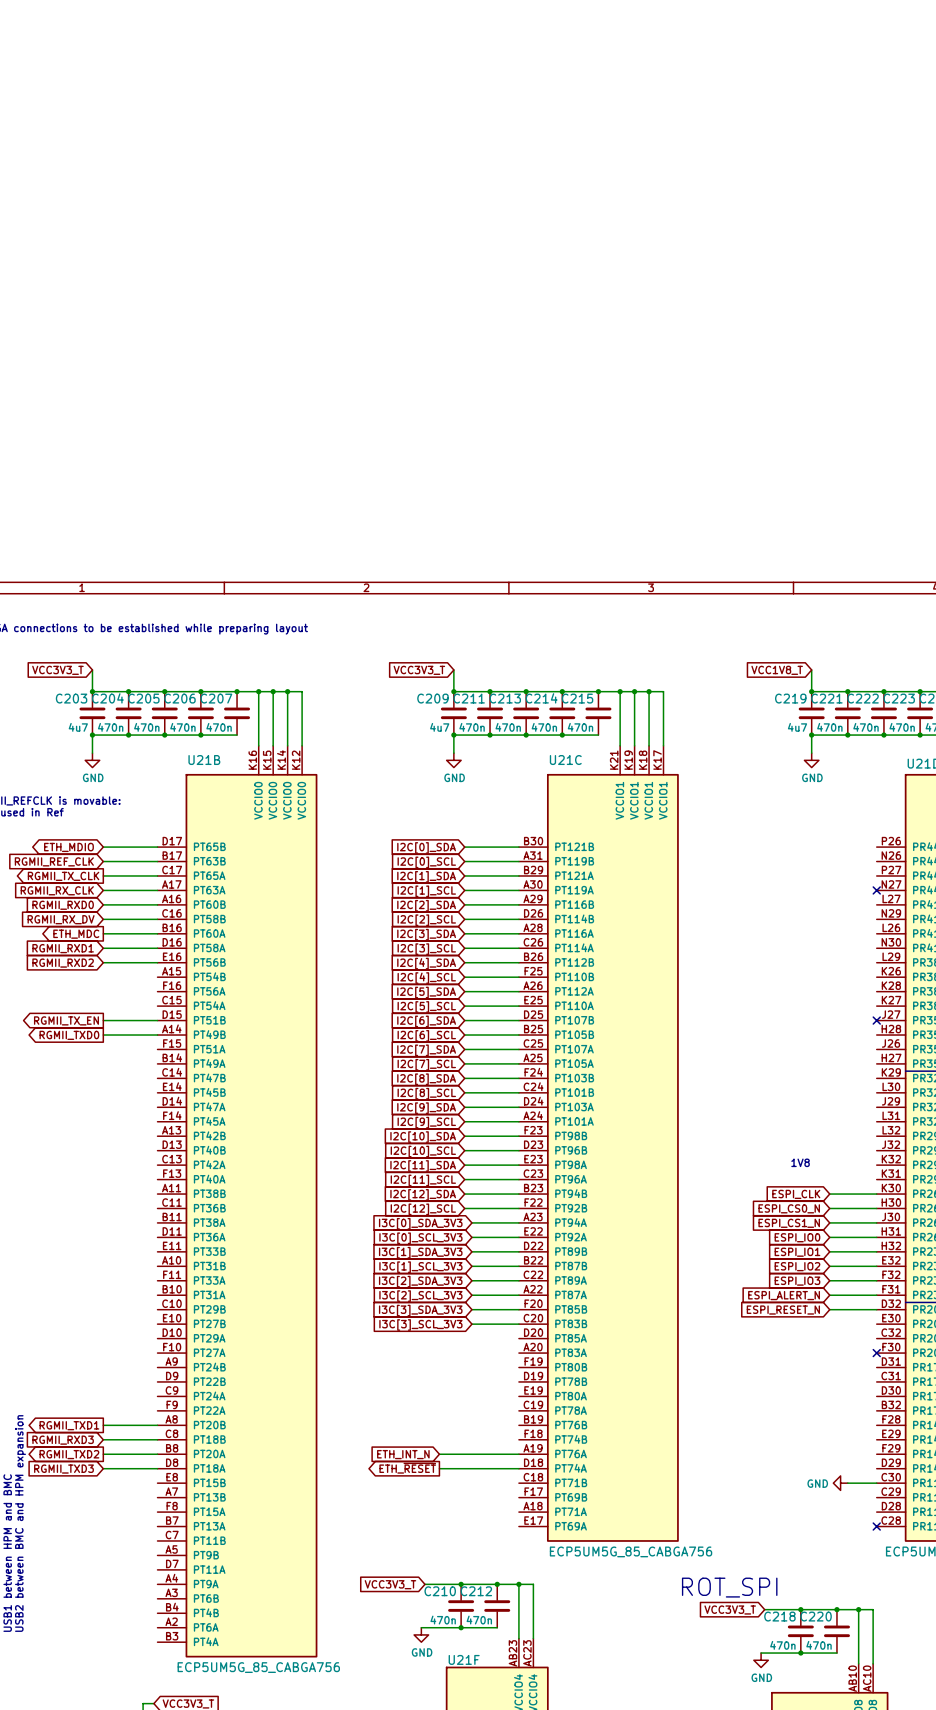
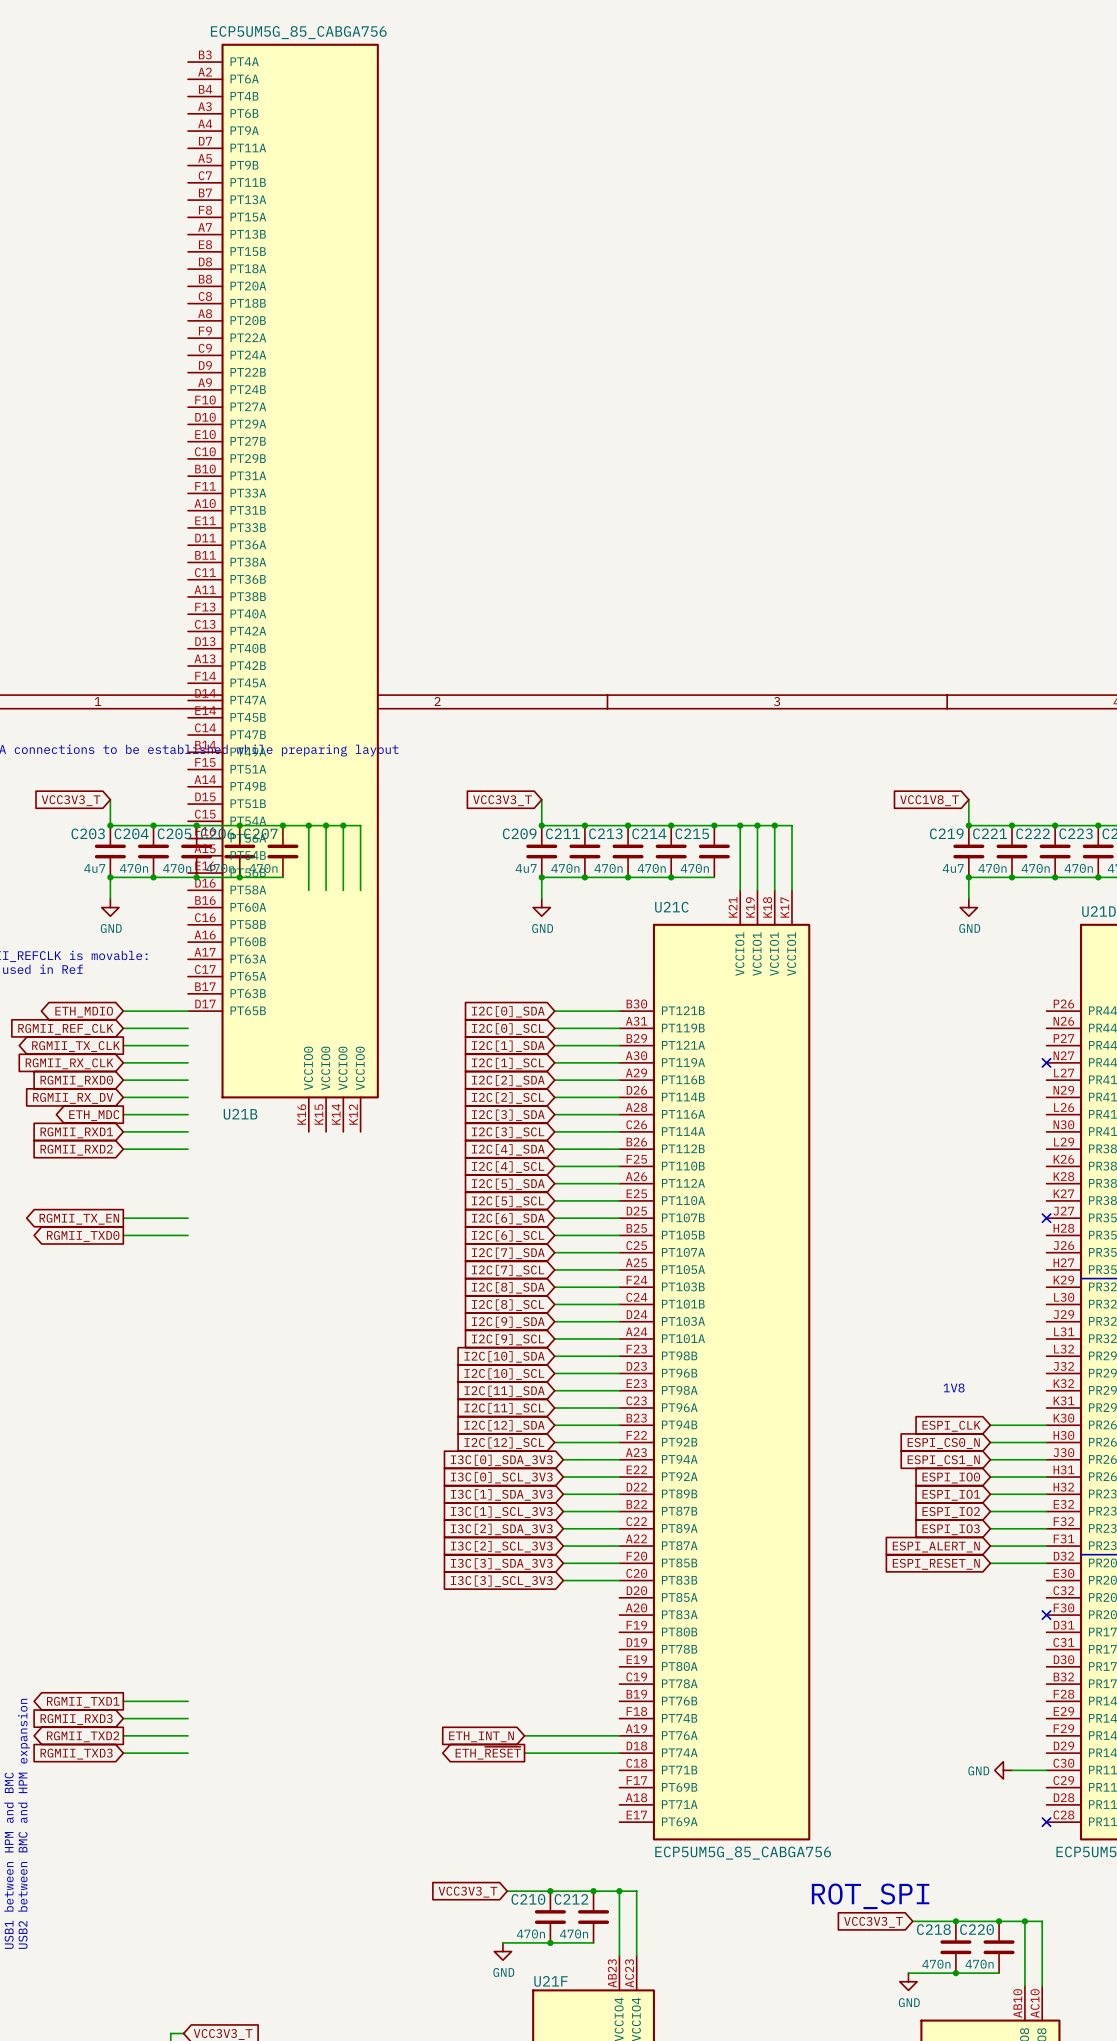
U21B position: (237, 1201) -> (283, 587)
U21B flip: as is (251, 1215) -> up-down (300, 571)

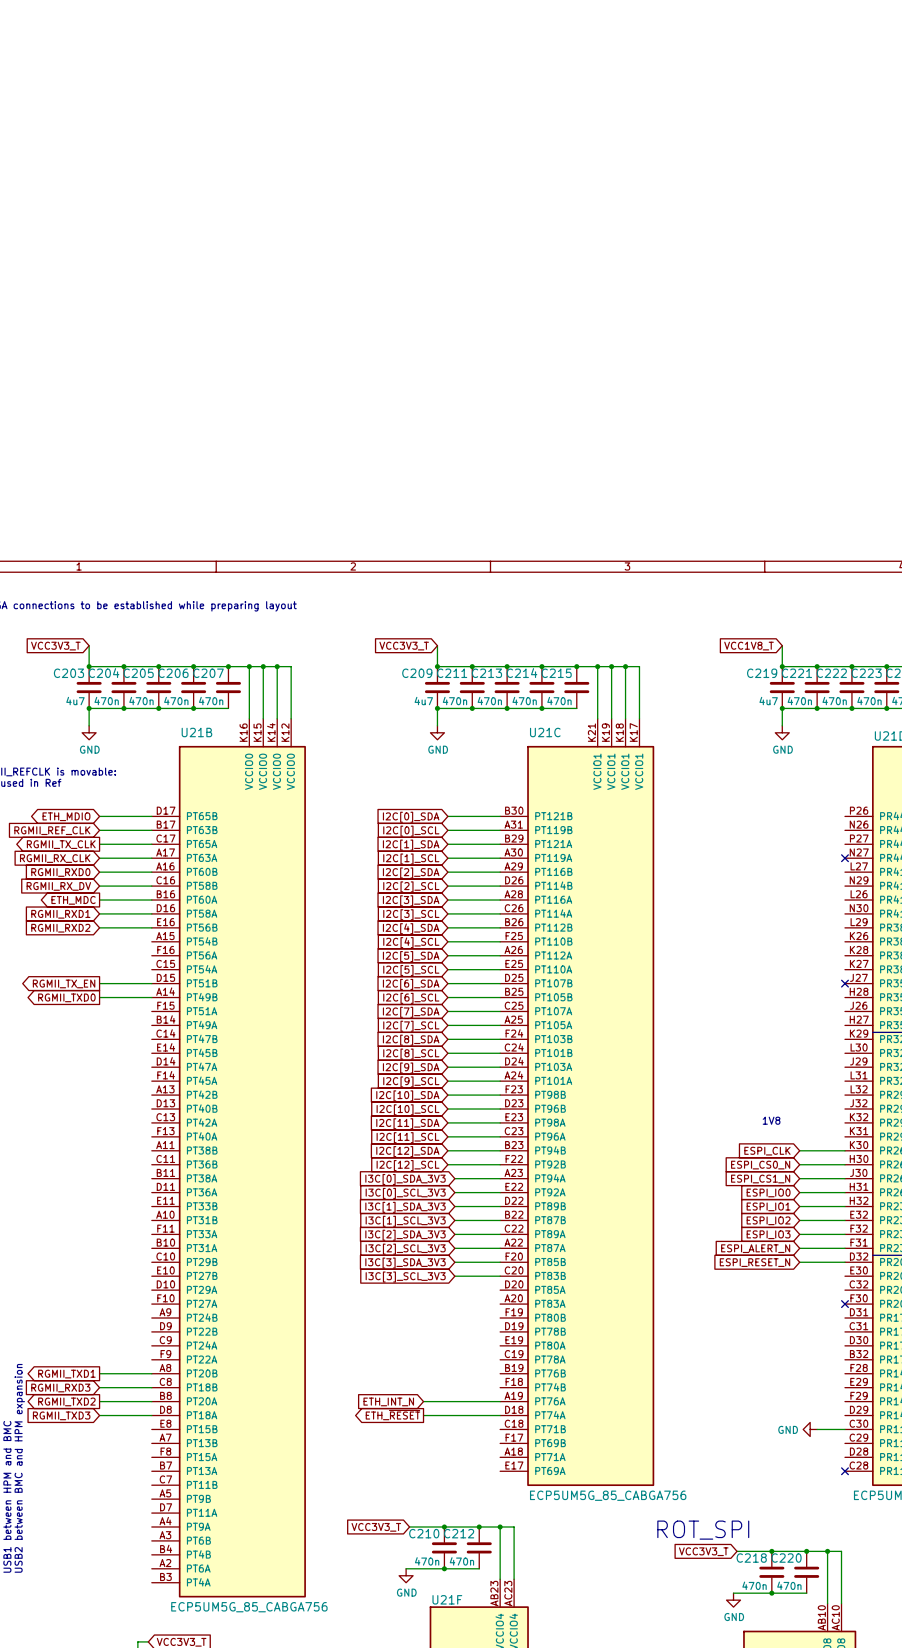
U21B flip: as is (300, 571) -> up-down (242, 1171)
U21B position: (283, 587) -> (228, 1158)

